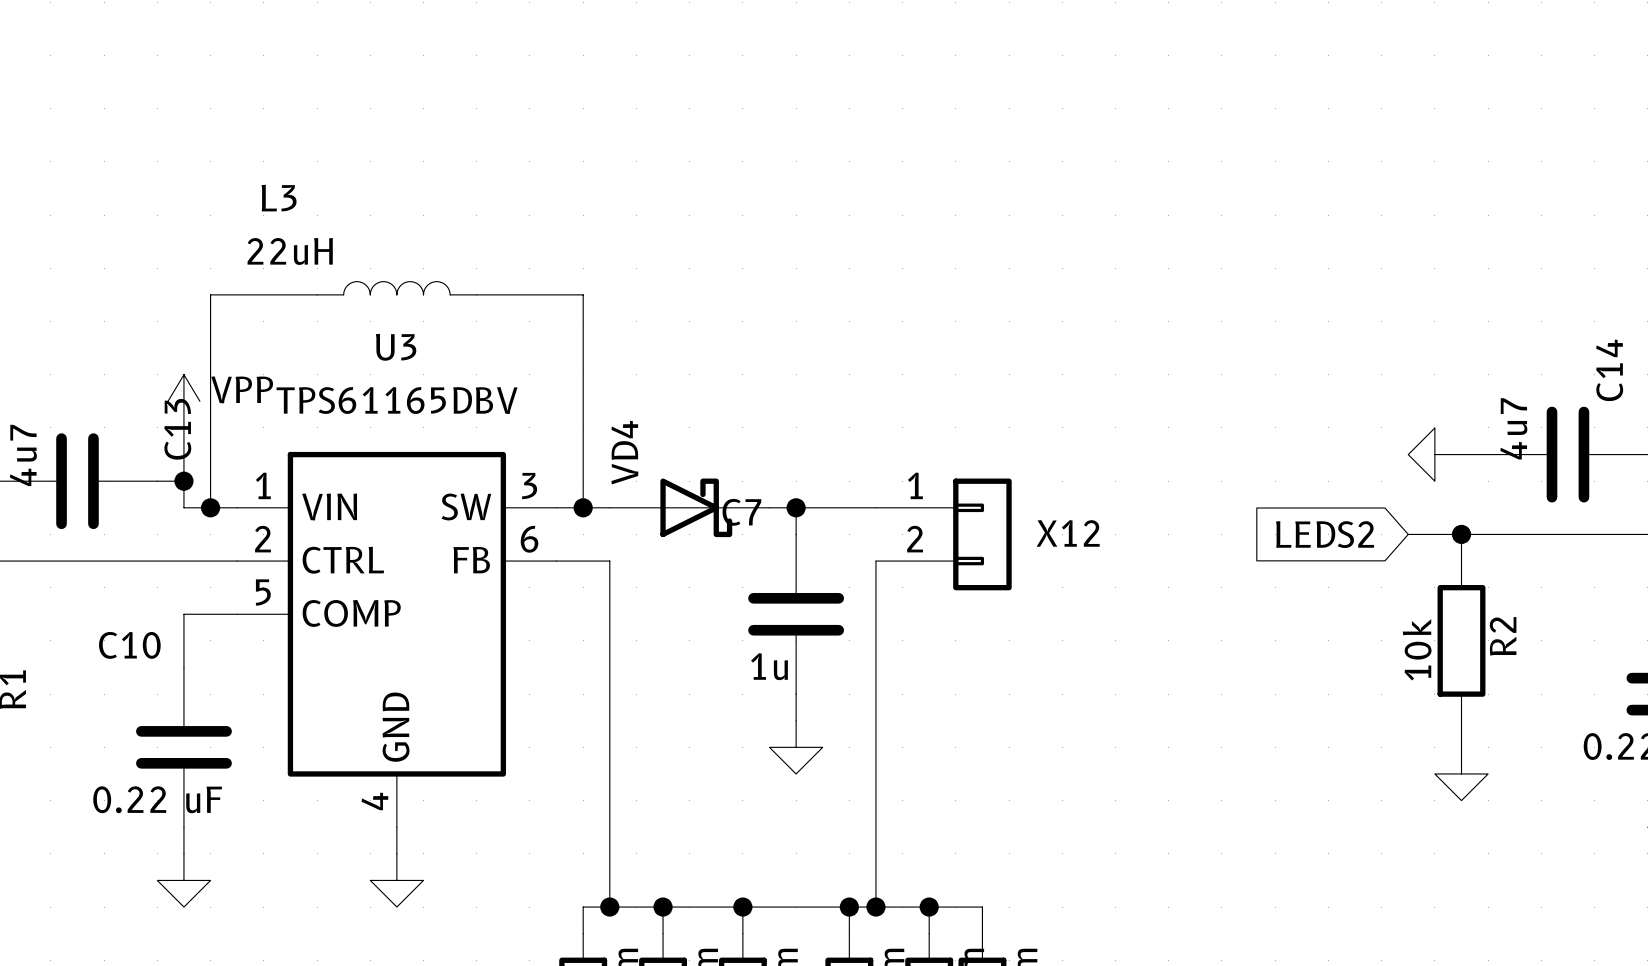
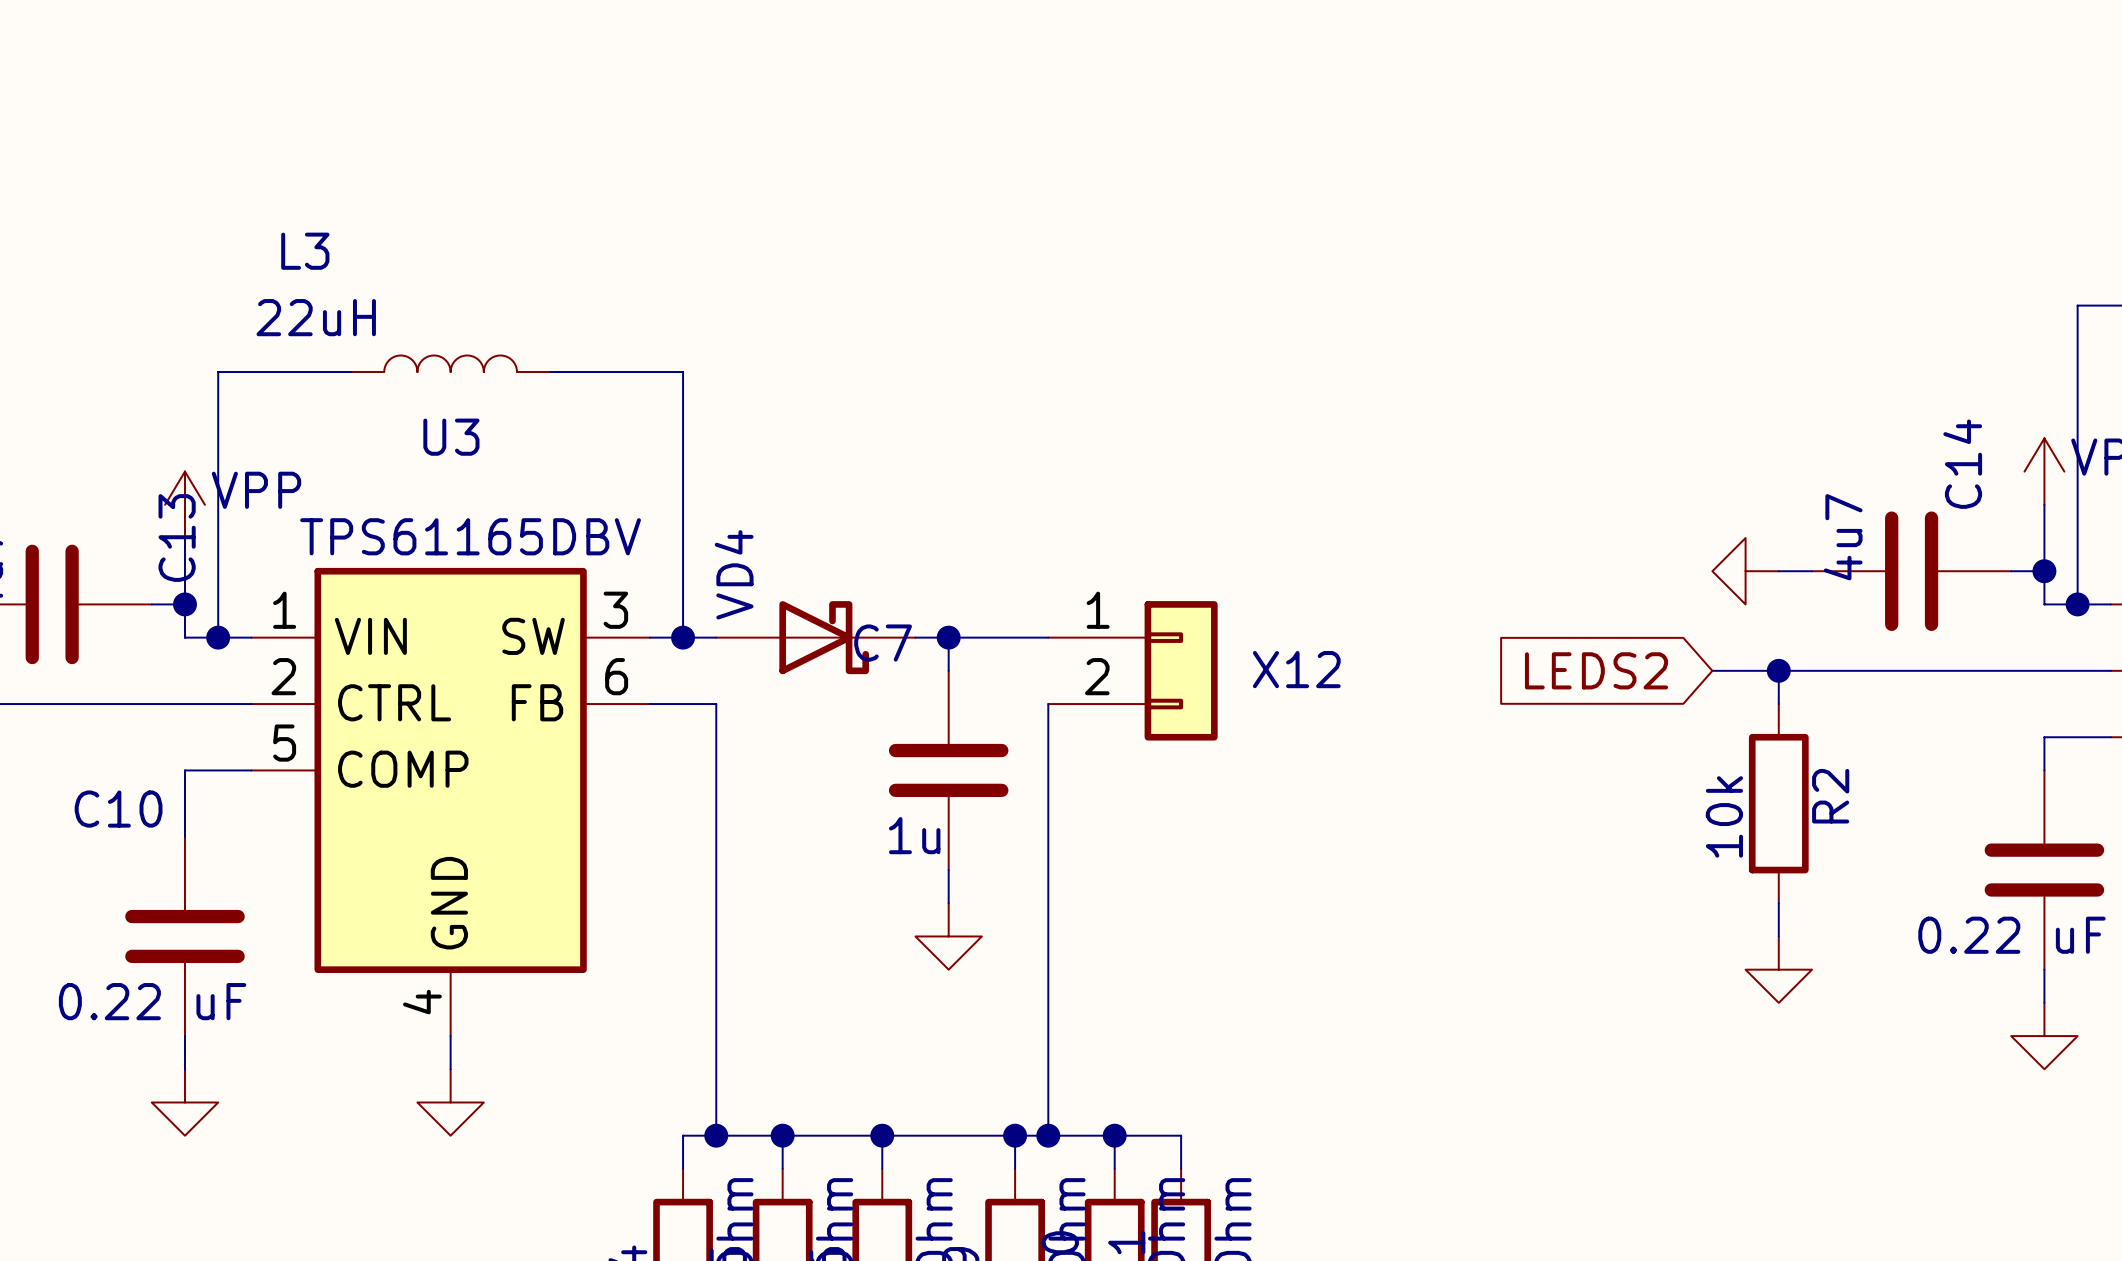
U3 value position: TPS61165DBV (397, 400) -> TPS61165DBV (470, 536)

